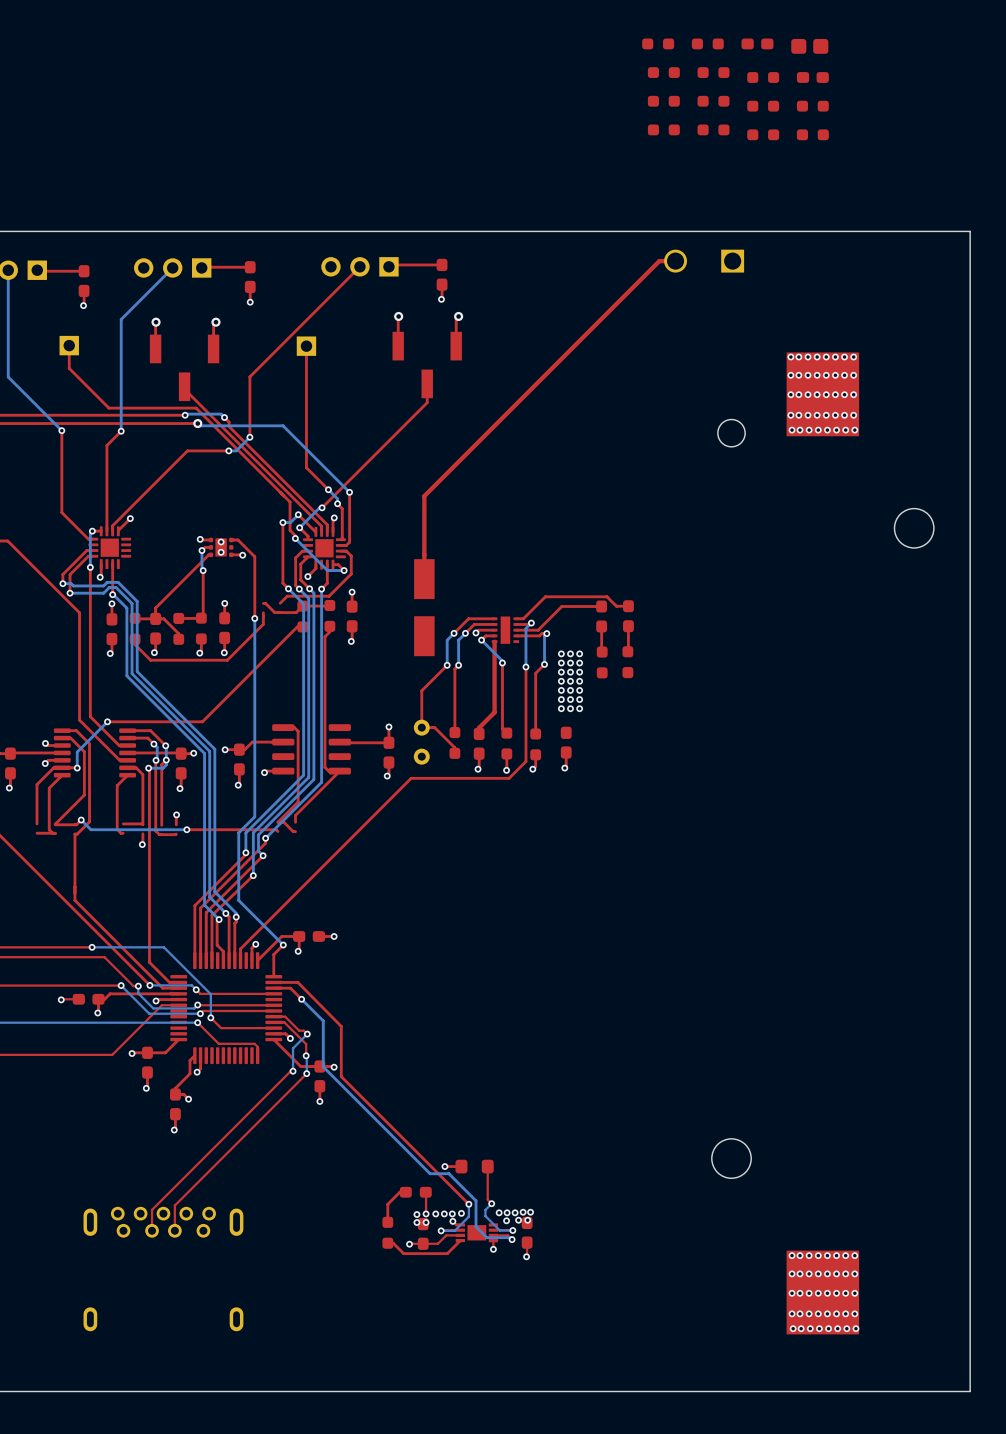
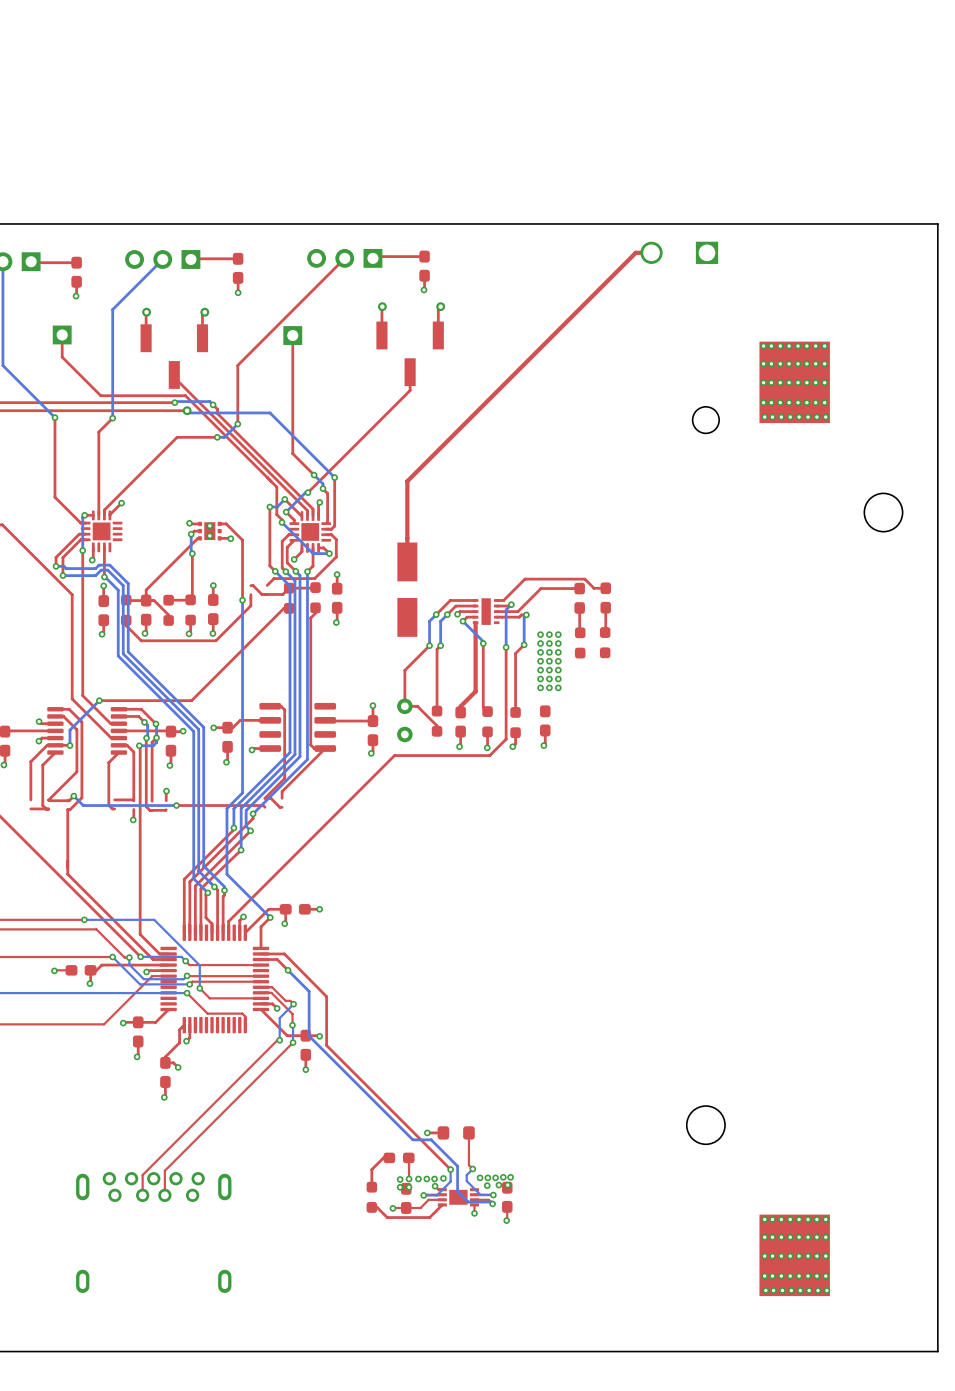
part: (658, 43) -> none
part: (707, 43) -> none
part: (757, 43) -> none
part: (809, 46) -> none
part: (663, 72) -> none
part: (713, 72) -> none
part: (763, 77) -> none
part: (812, 77) -> none
part: (663, 101) -> none
part: (713, 101) -> none
part: (763, 106) -> none
part: (812, 106) -> none
part: (663, 129) -> none
part: (713, 129) -> none
part: (763, 134) -> none
part: (812, 134) -> none

